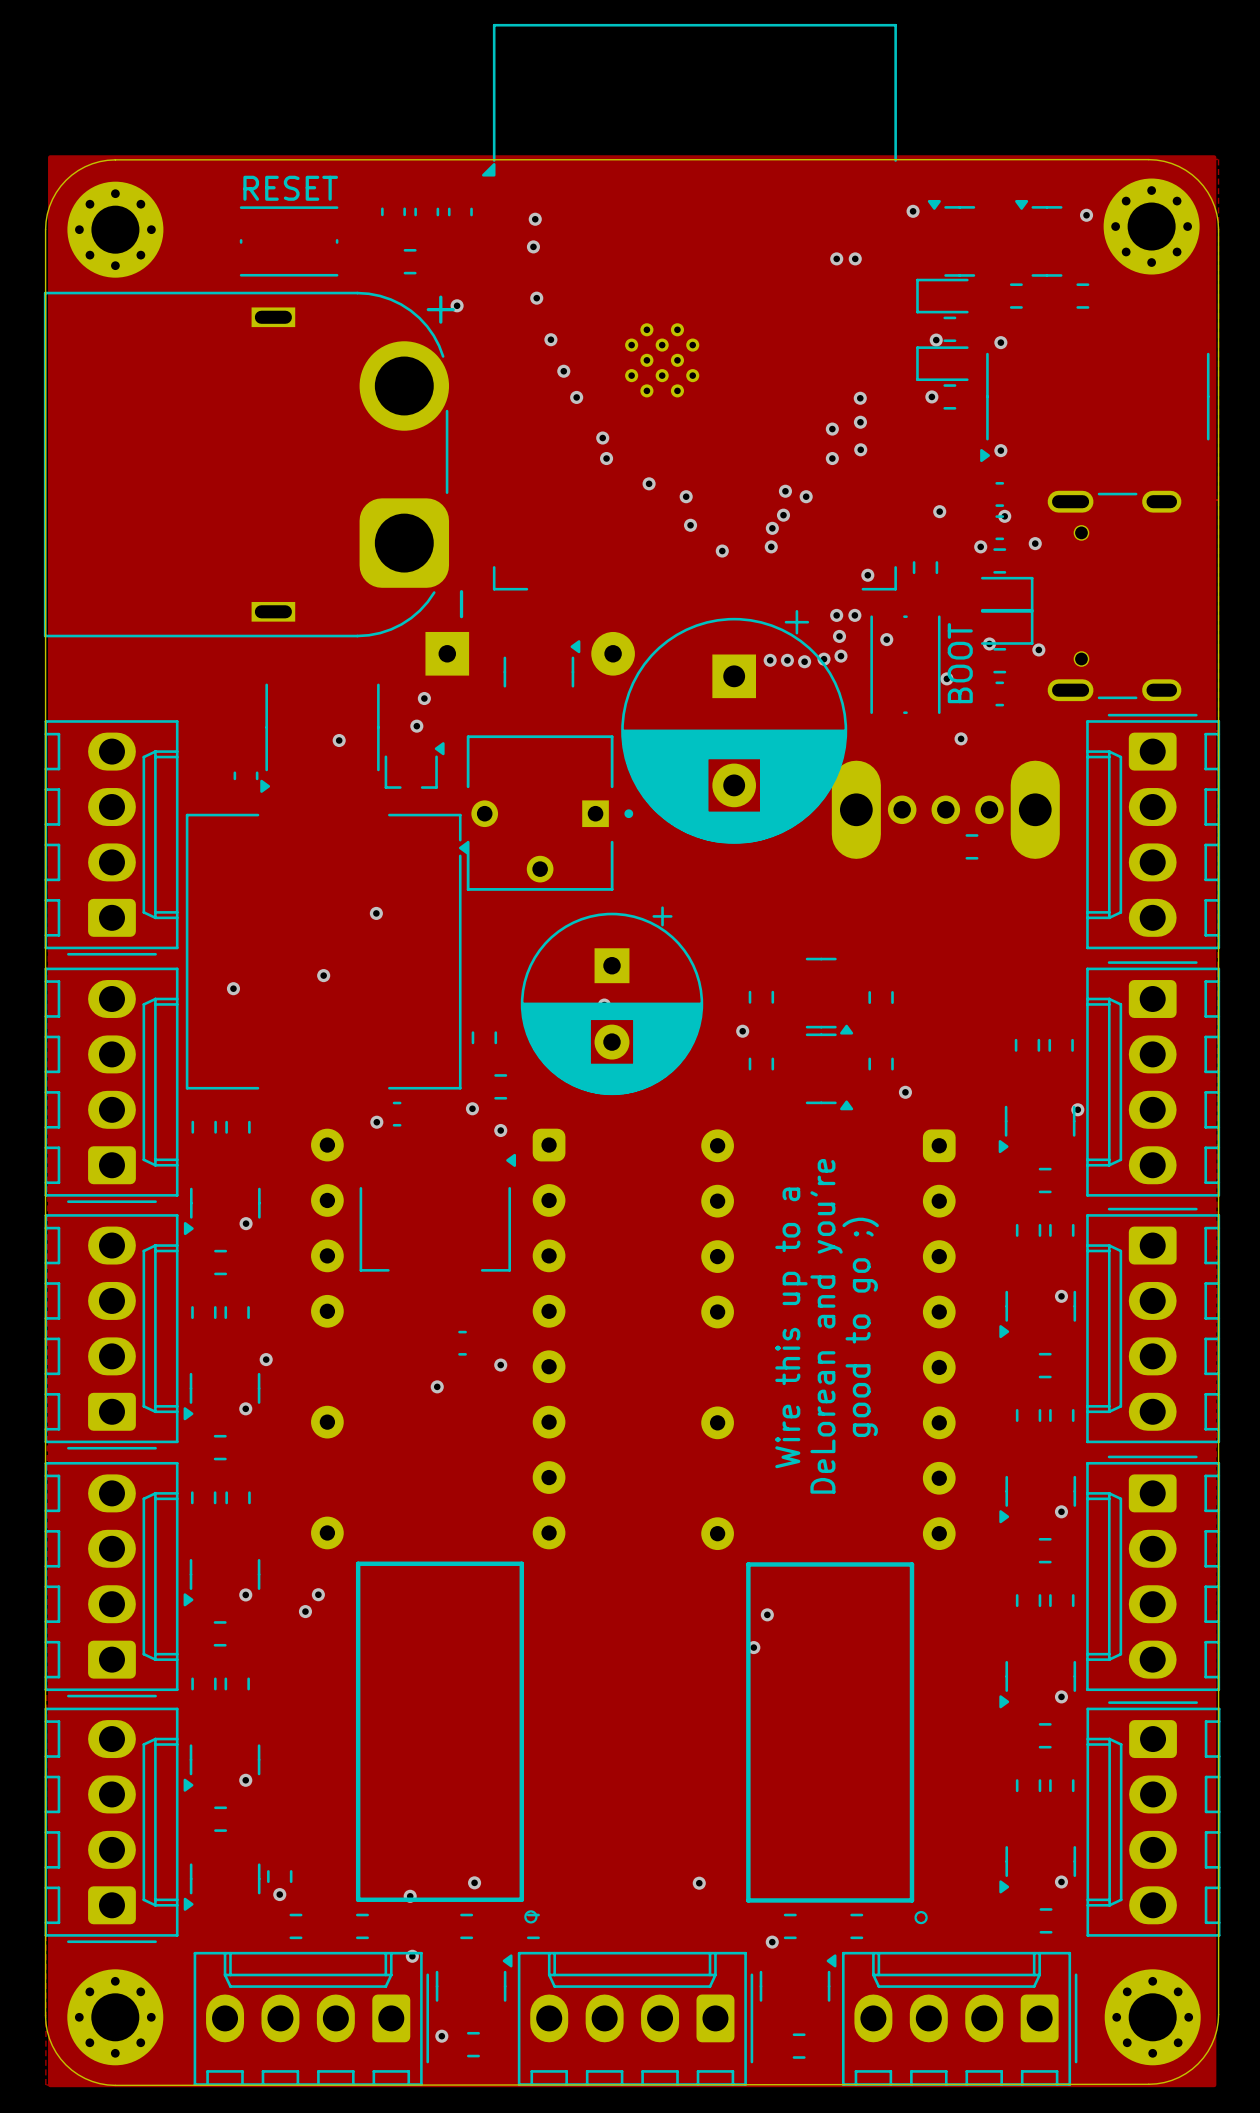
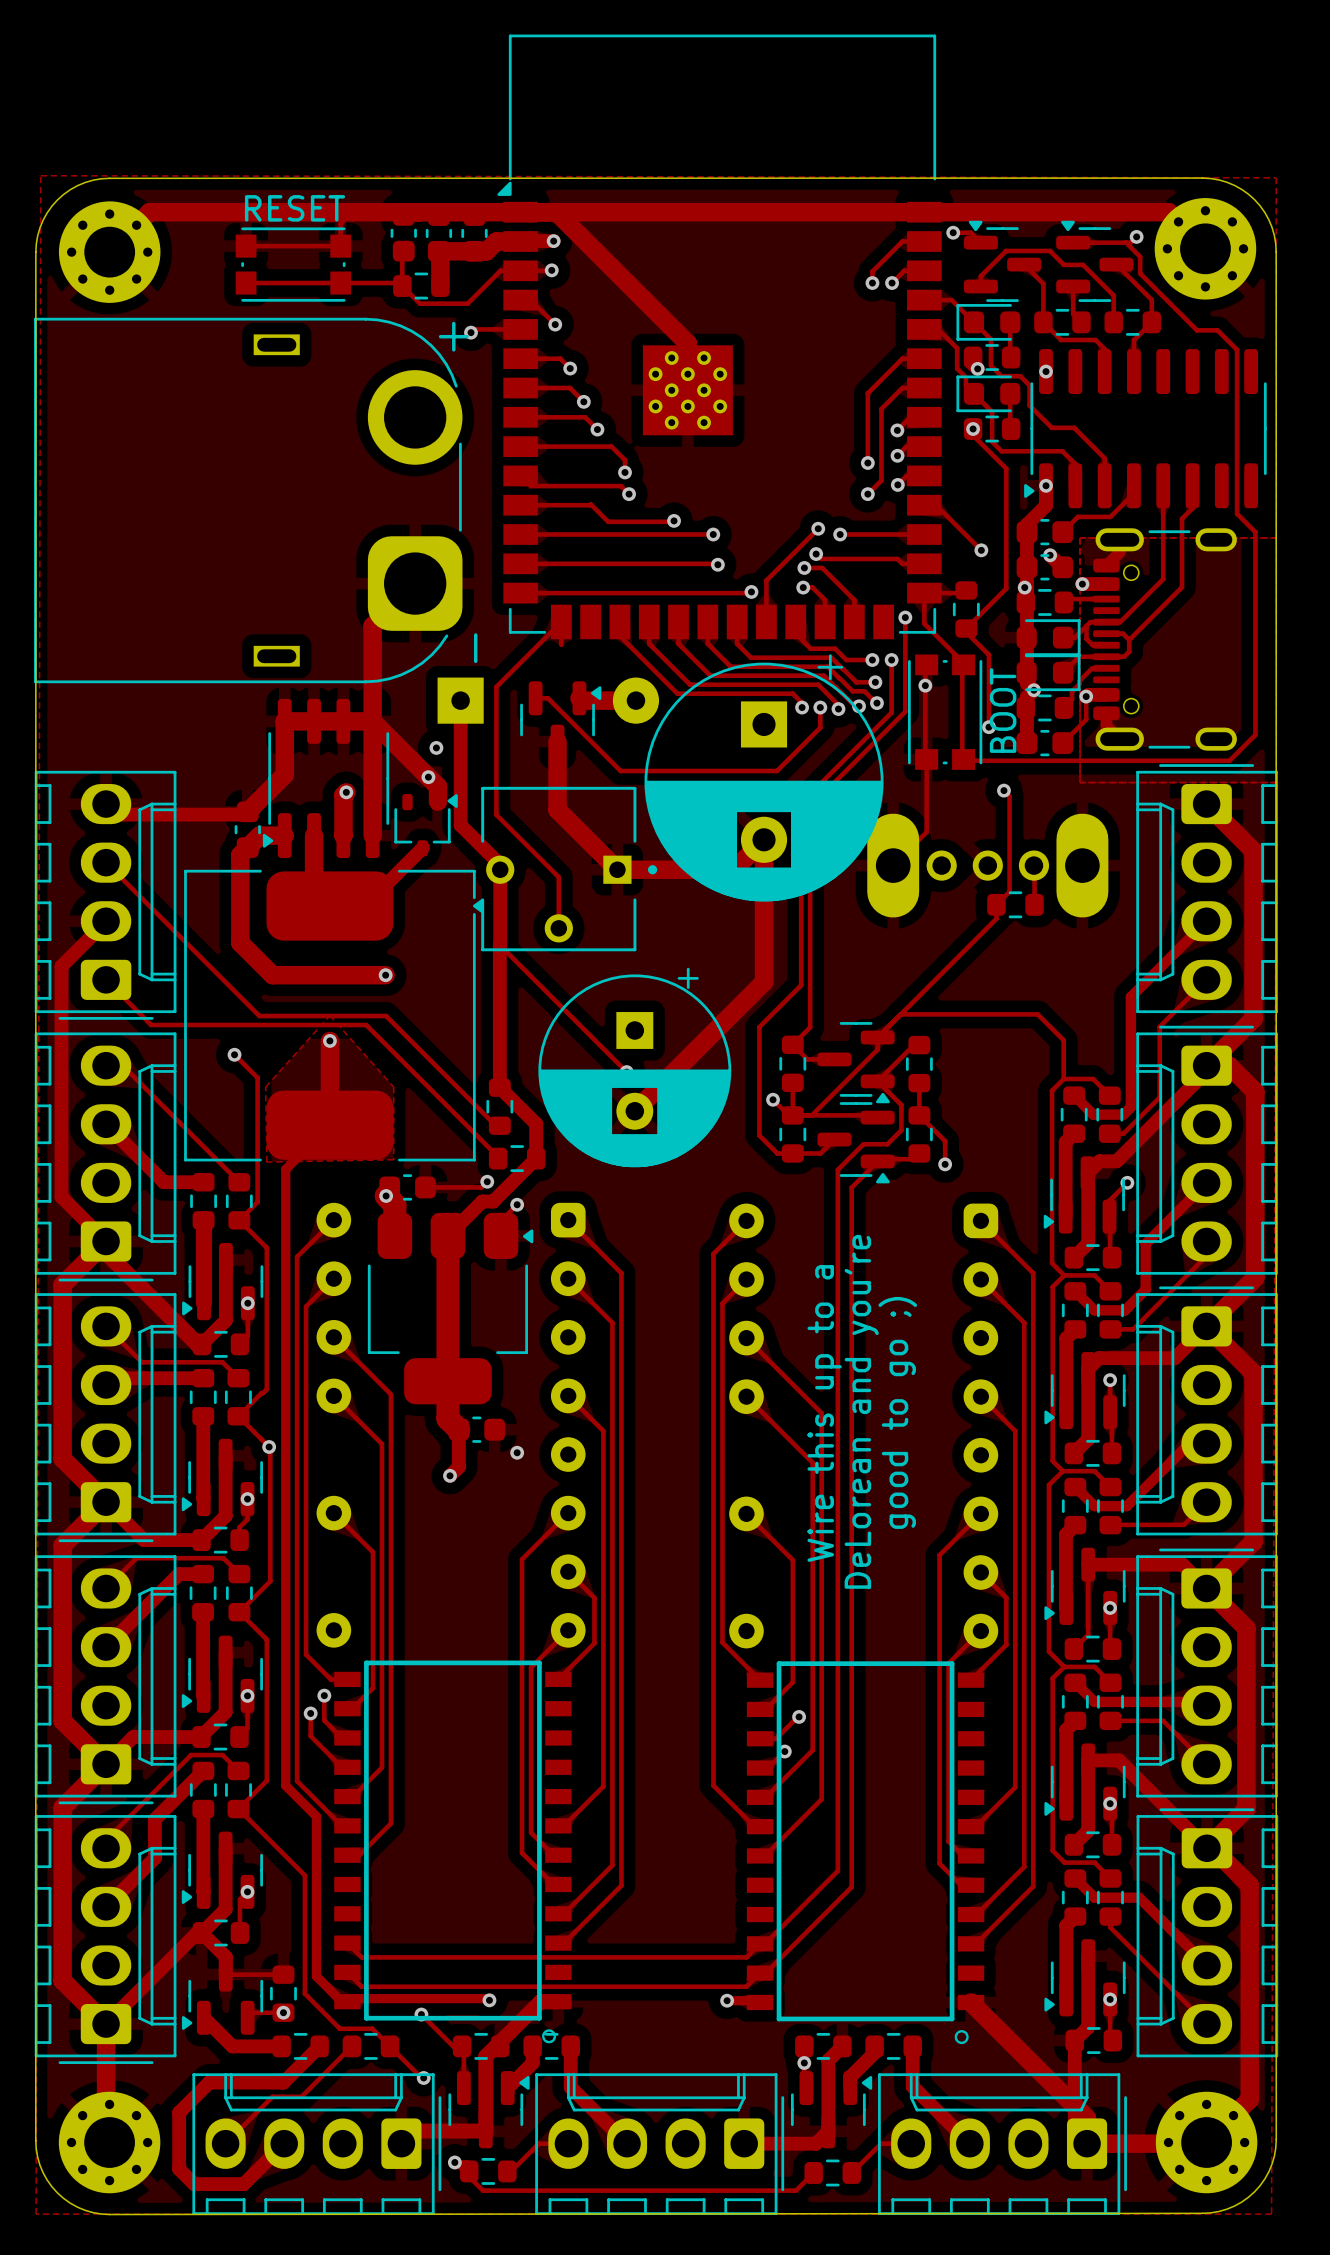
drawing: [48, 155, 1217, 2088] -> none

